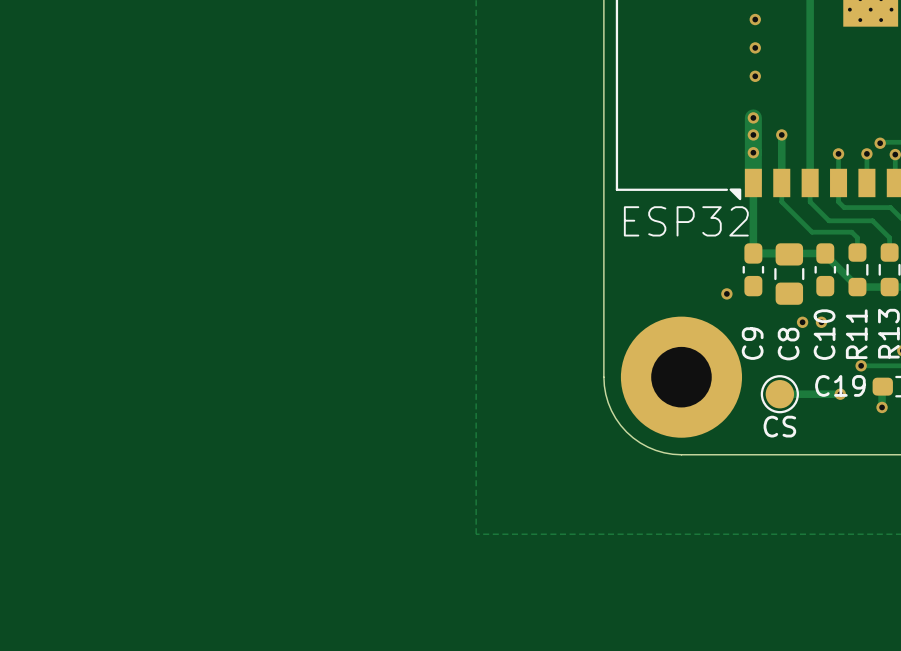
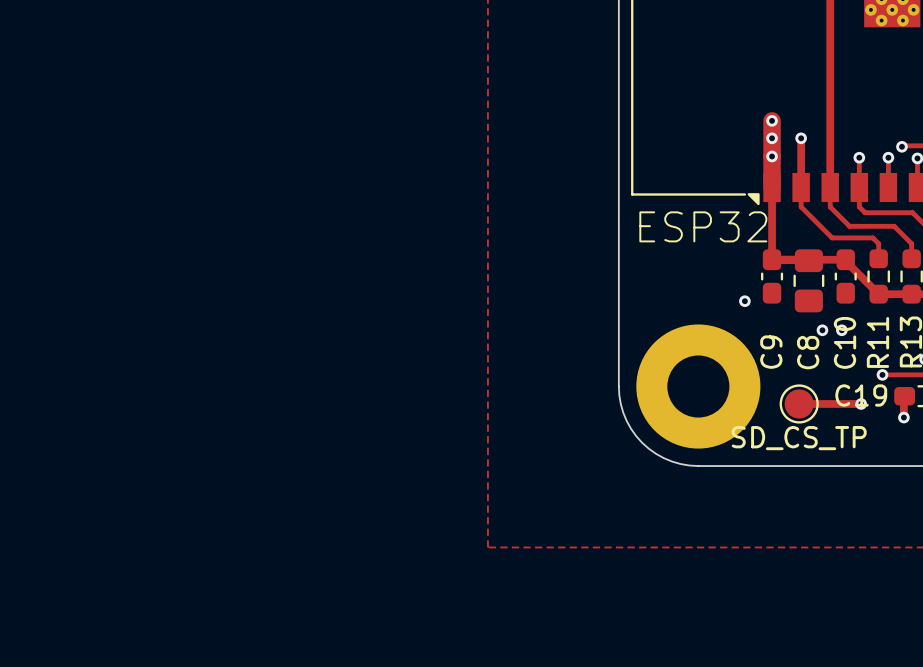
via: (755, 19) -> none
via: (755, 47) -> none
via: (755, 76) -> none
part value: CS (779, 426) -> SD_CS_TP (799, 438)

